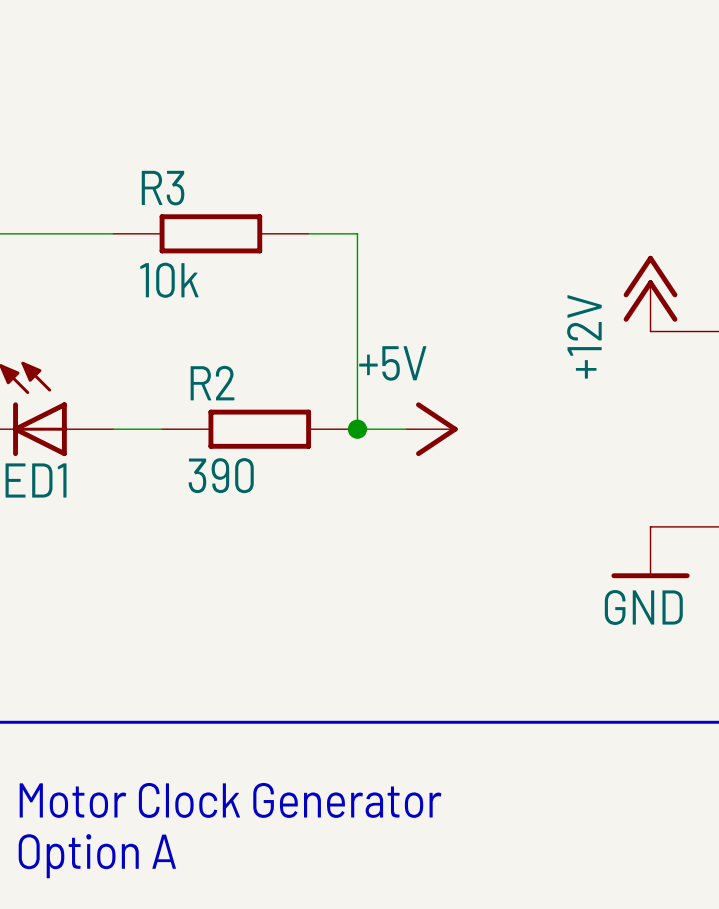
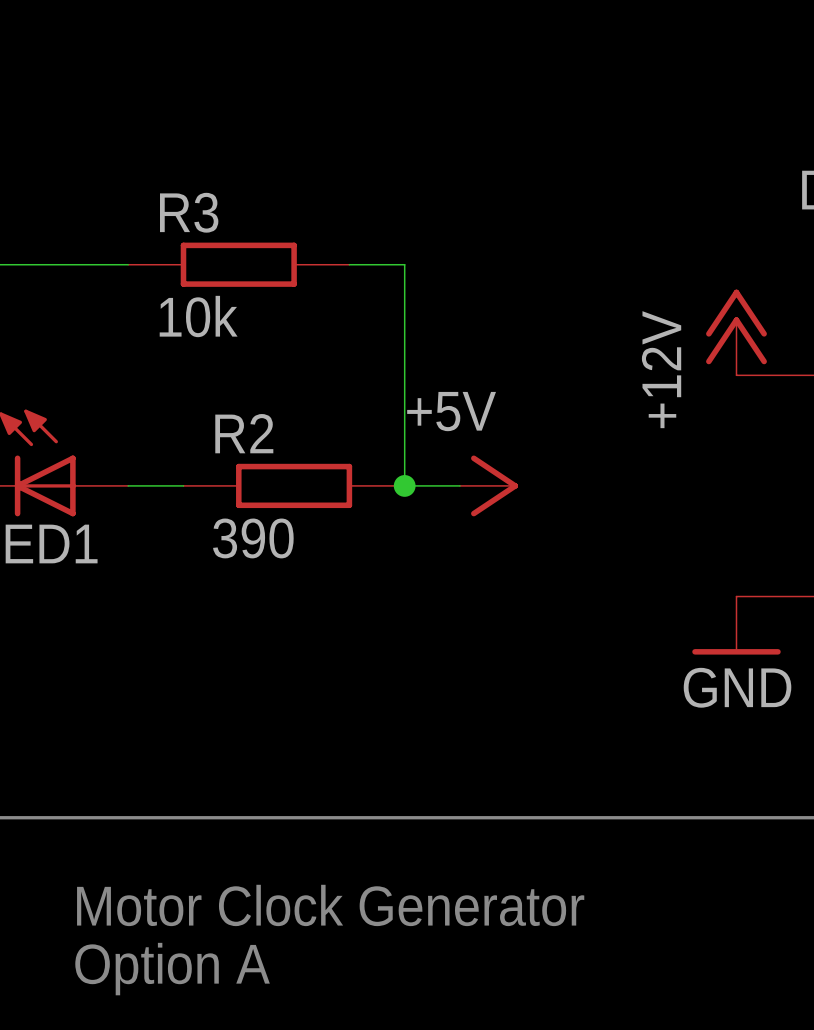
text position: Motor Clock Generator (230, 800) -> Motor Clock Generator (330, 905)
text position: Option A (97, 856) -> Option A (172, 969)

